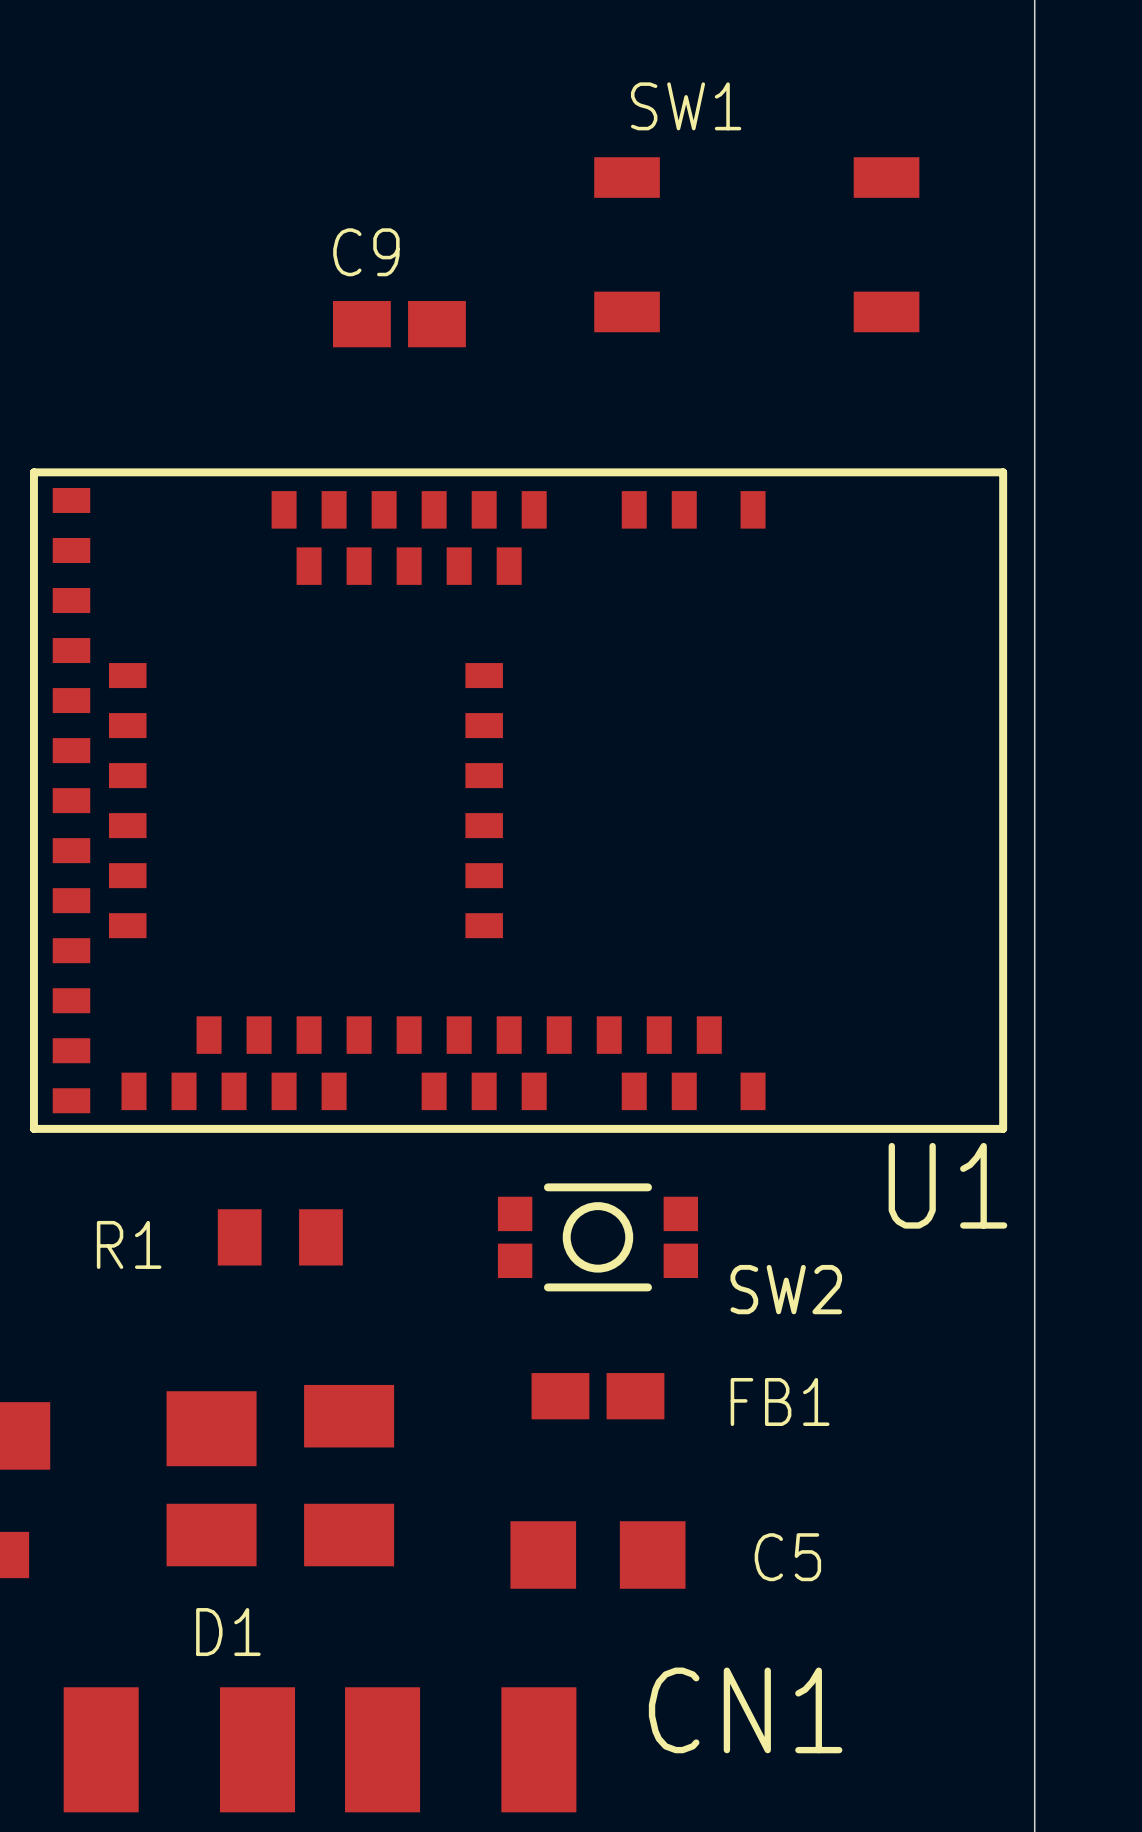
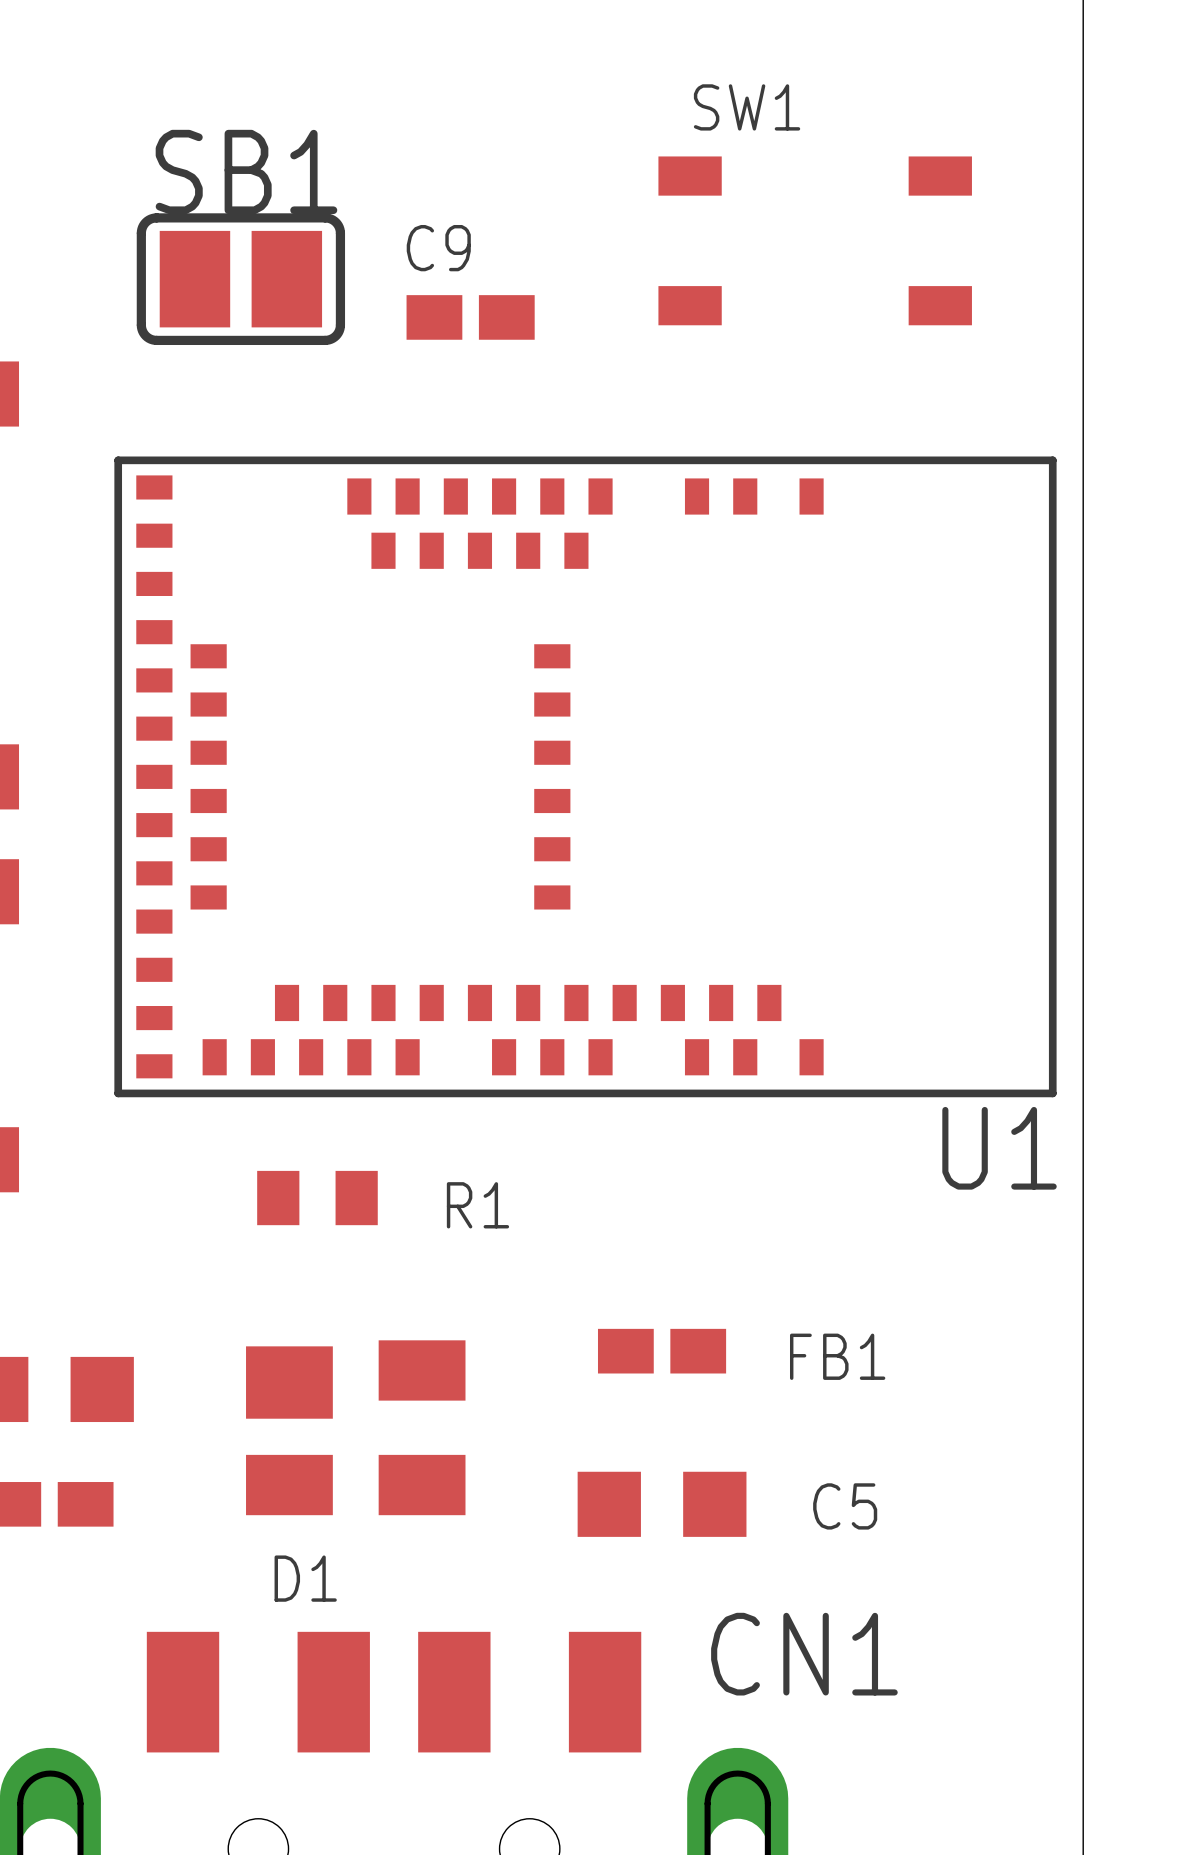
SB1: none -> (240, 279)
R1 position: (280, 1237) -> (317, 1198)
SW2: (597, 1237) -> none
R1 name position: R1 (129, 1244) -> R1 (477, 1205)

